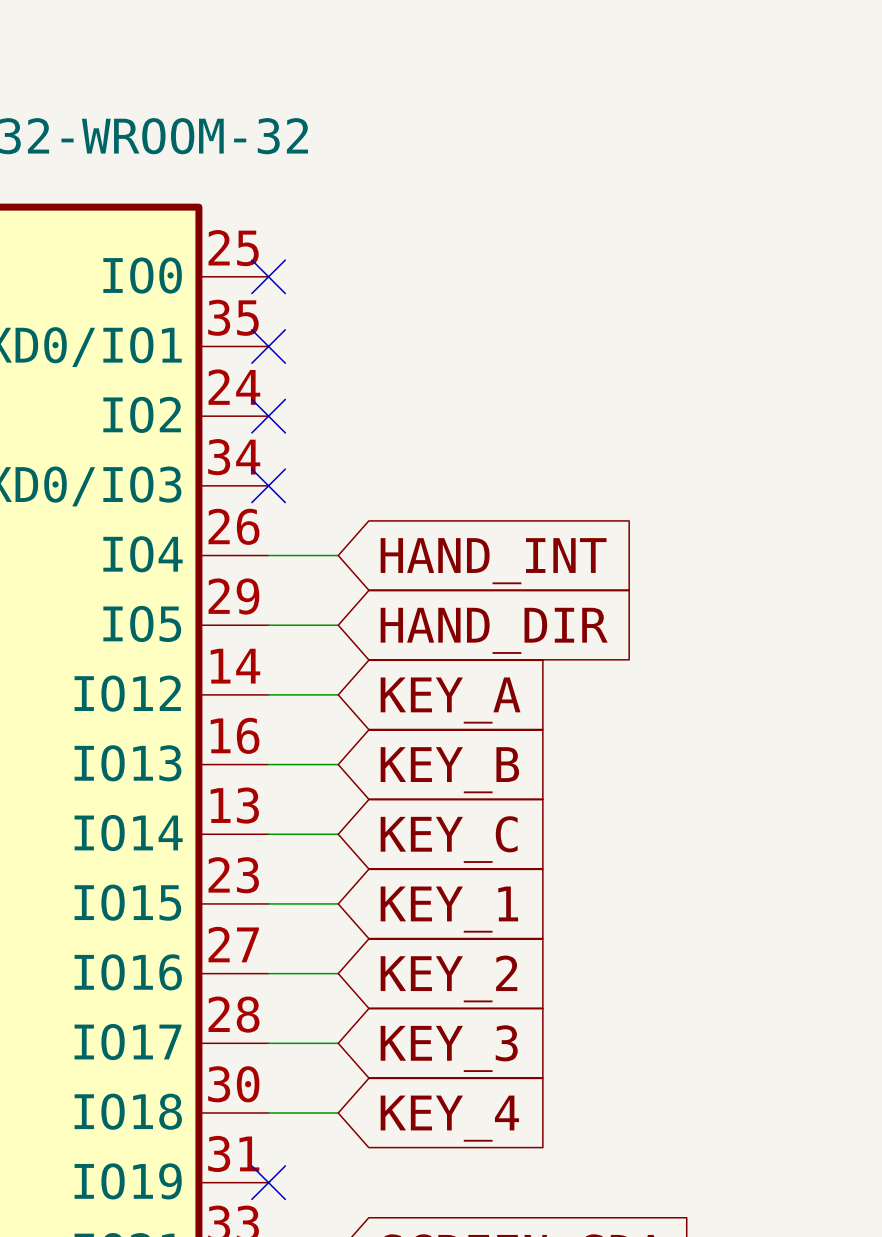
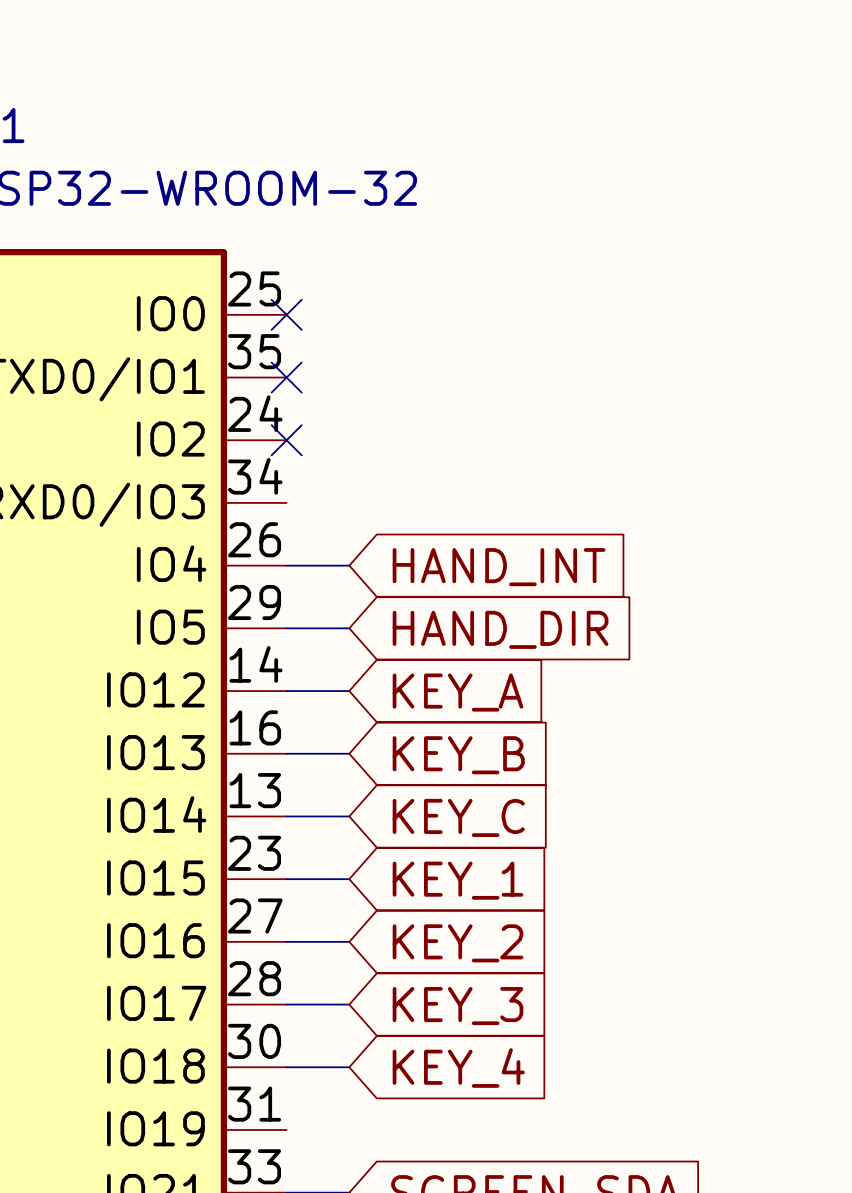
no-connect mark: (268, 485) -> none
no-connect mark: (268, 1182) -> none

